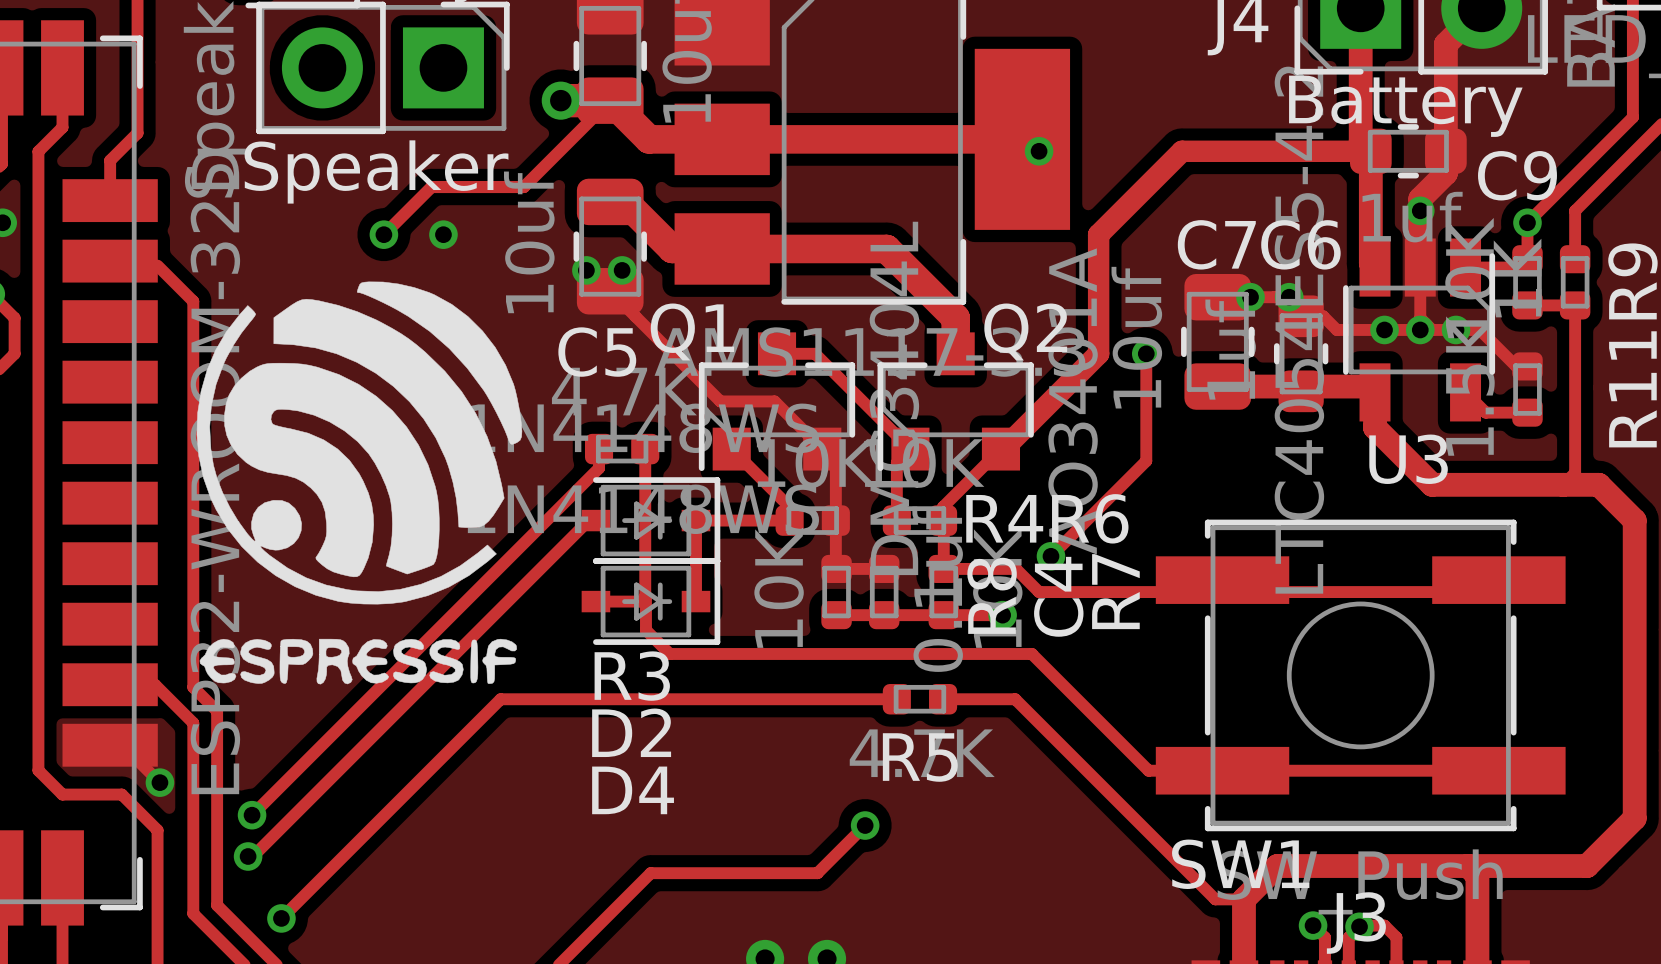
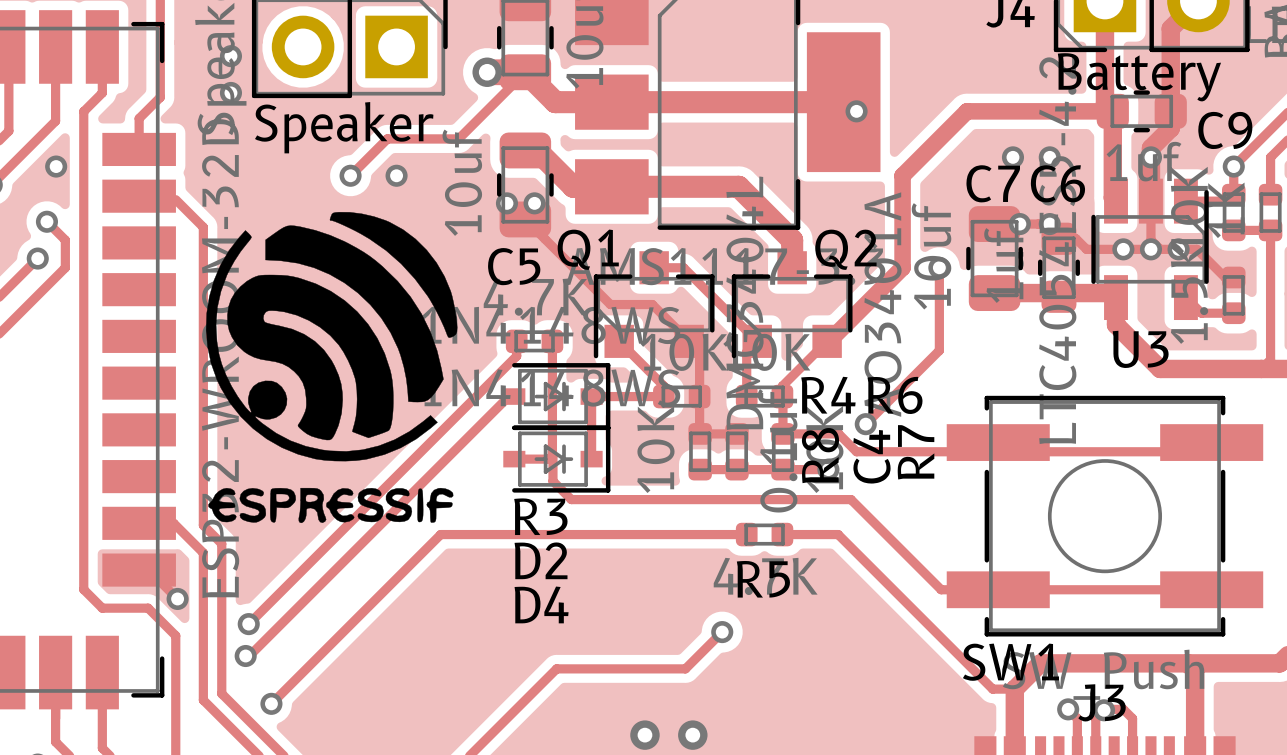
via: none -> (230, 56)
via: none -> (230, 92)
via: none -> (1012, 157)
via: none -> (1049, 157)

